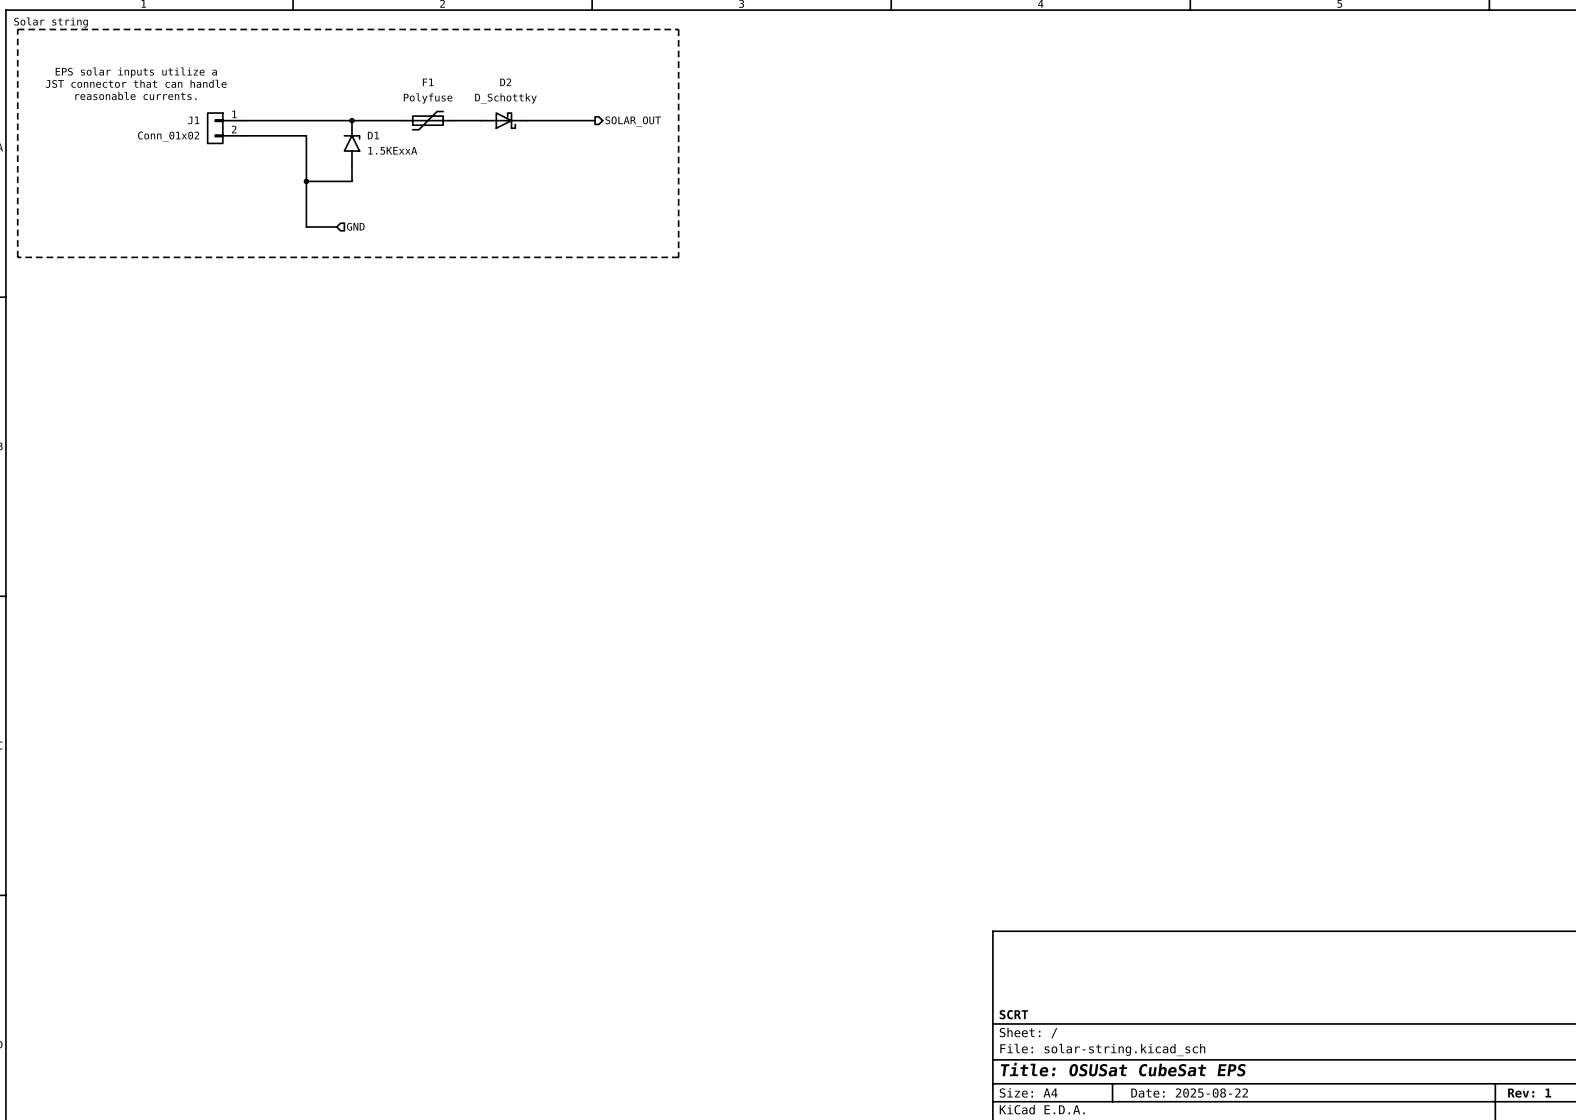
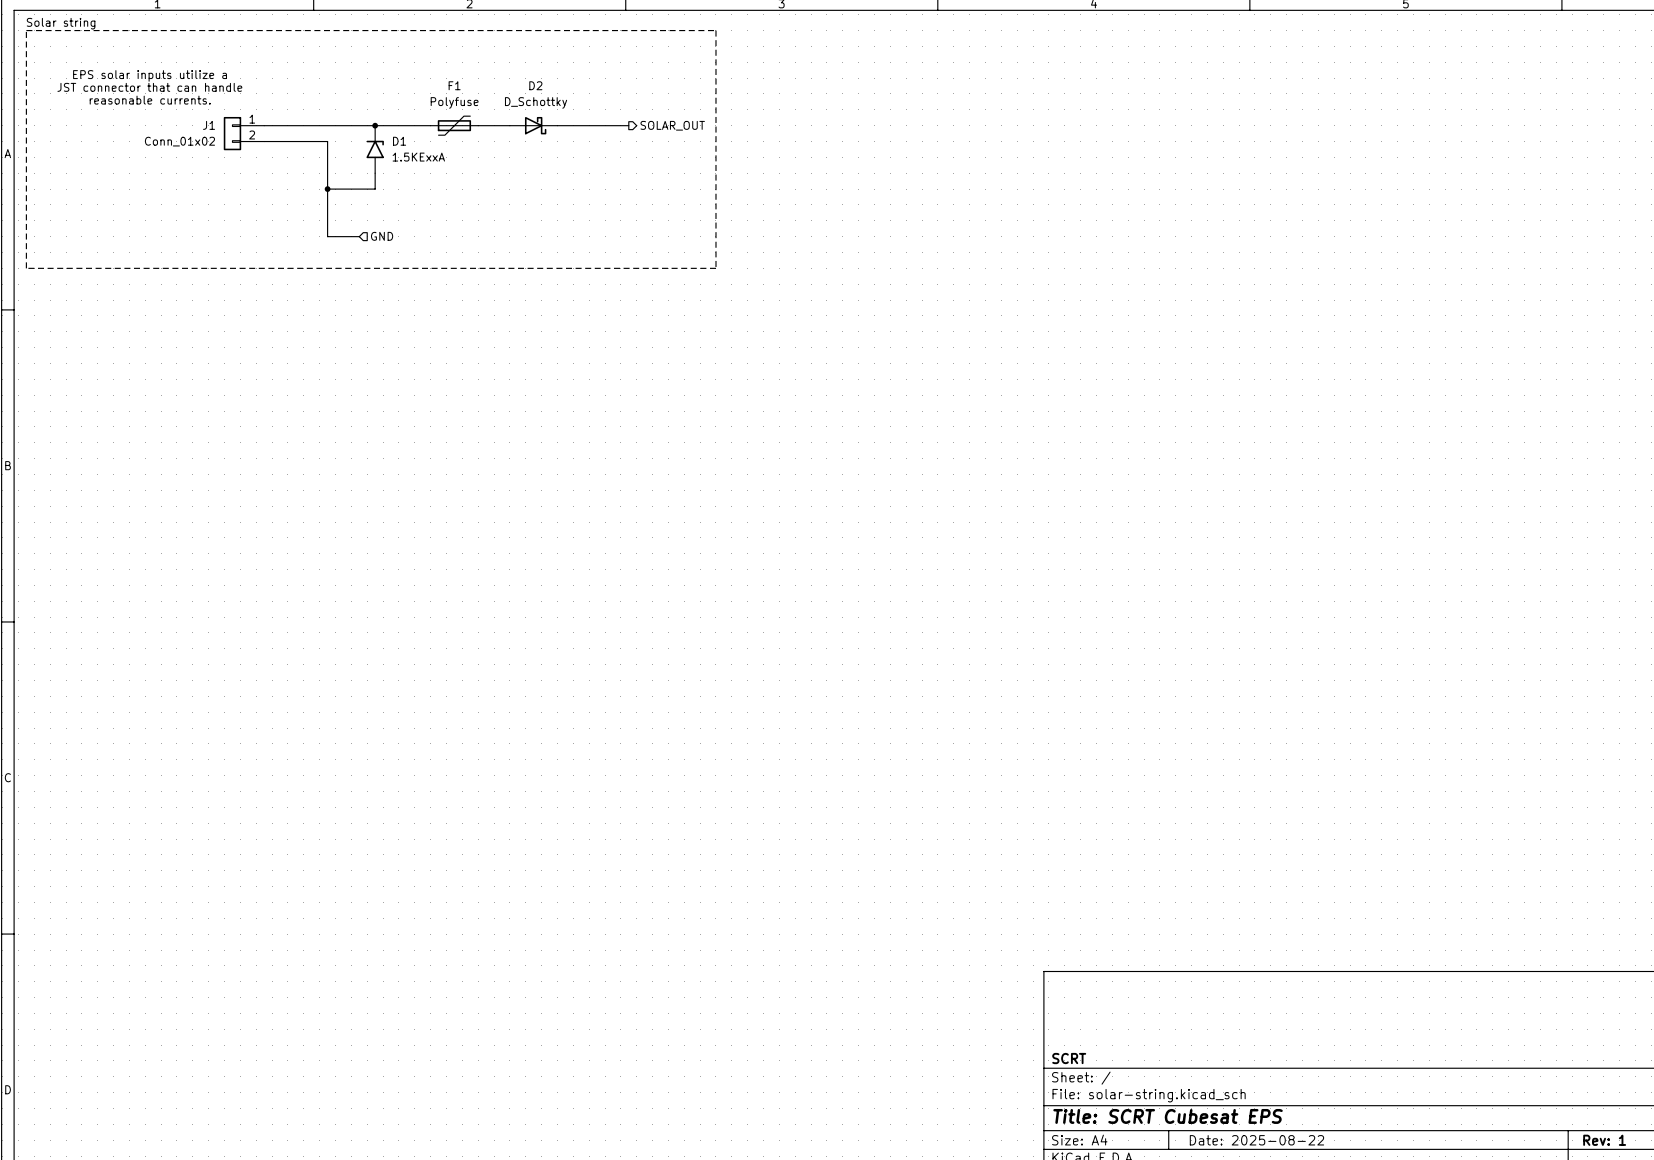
title block: Title: OSUSat CubeSat EPS (1123, 1069) -> Title: SCRT Cubesat EPS (1168, 1116)

